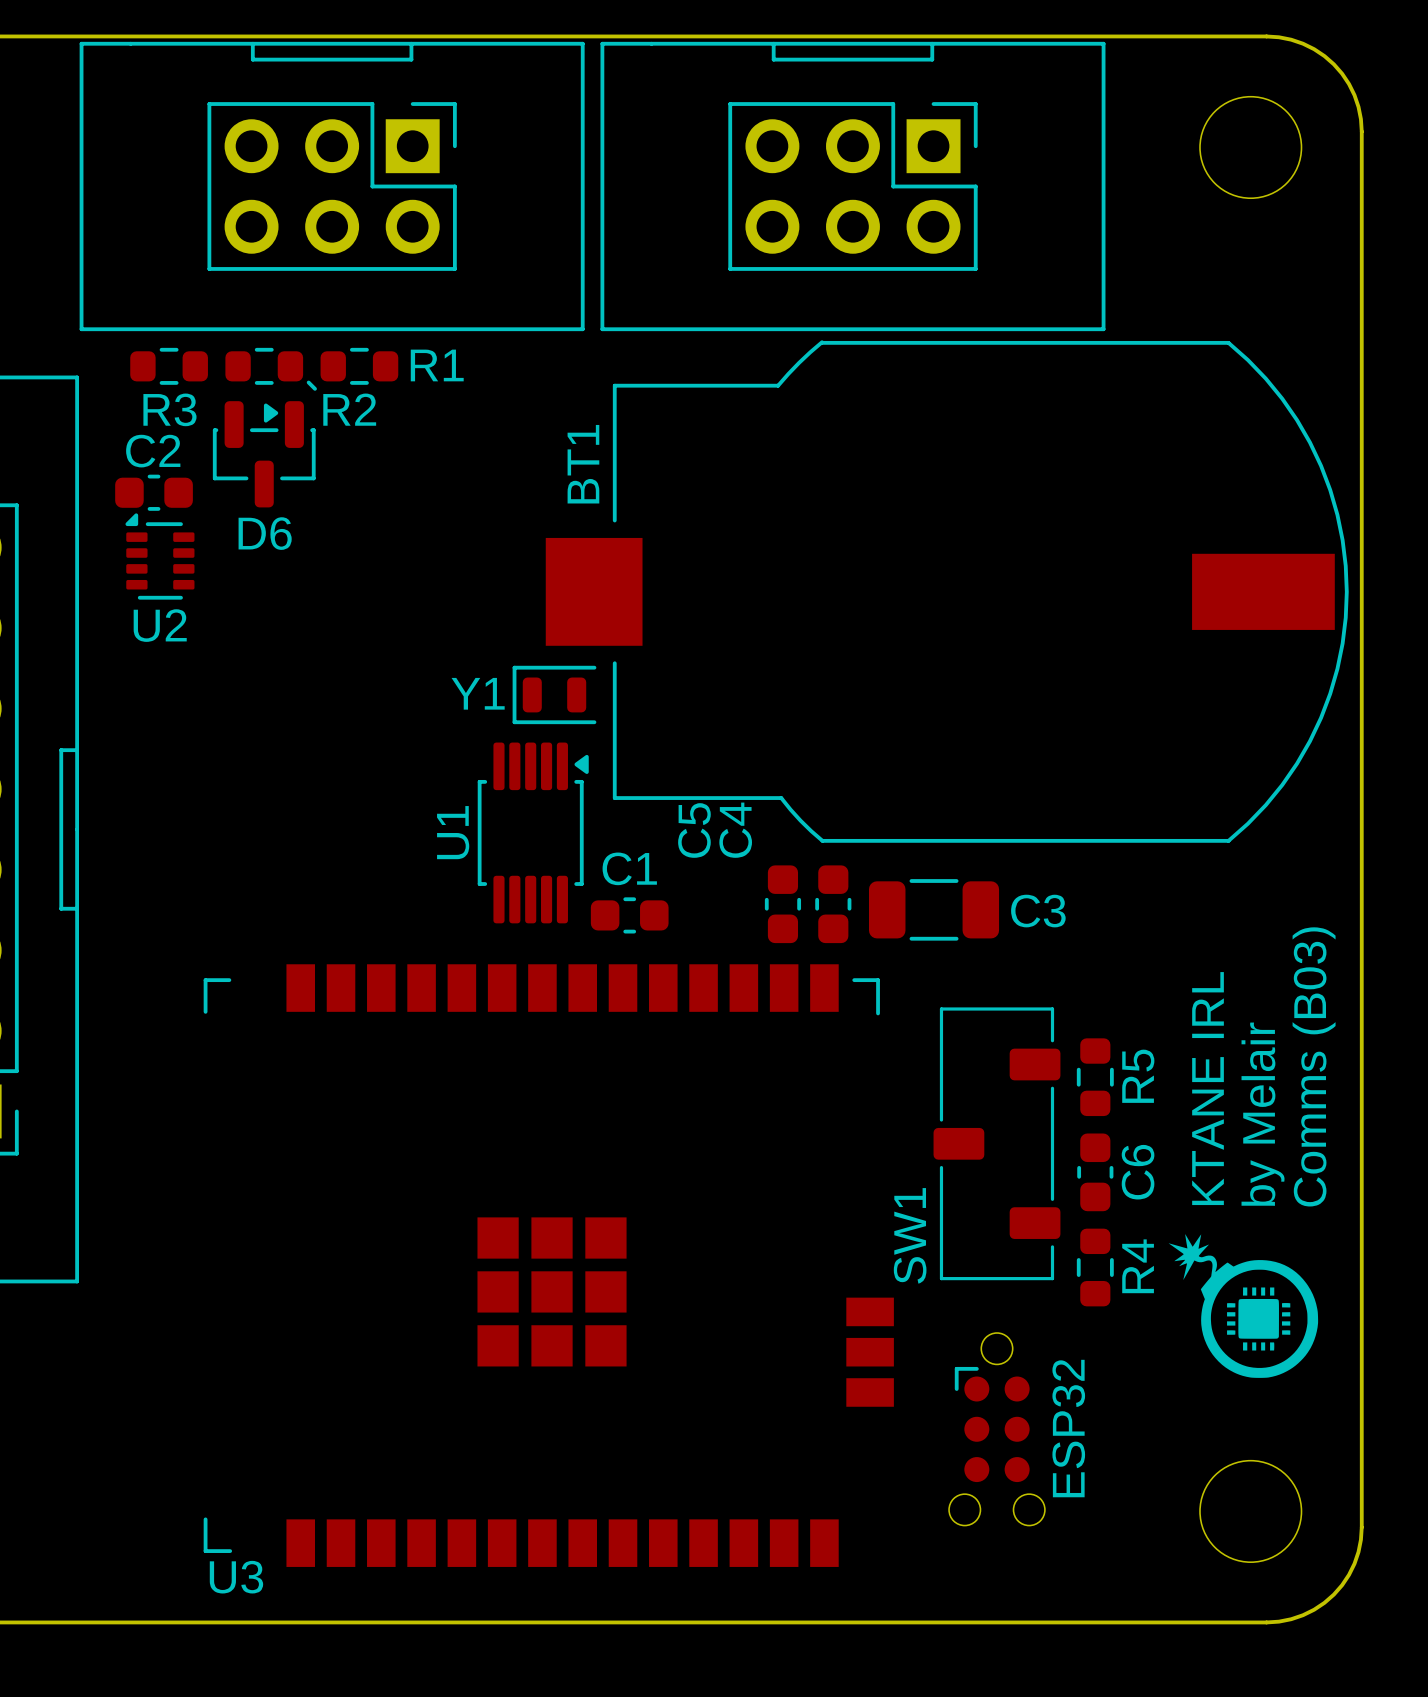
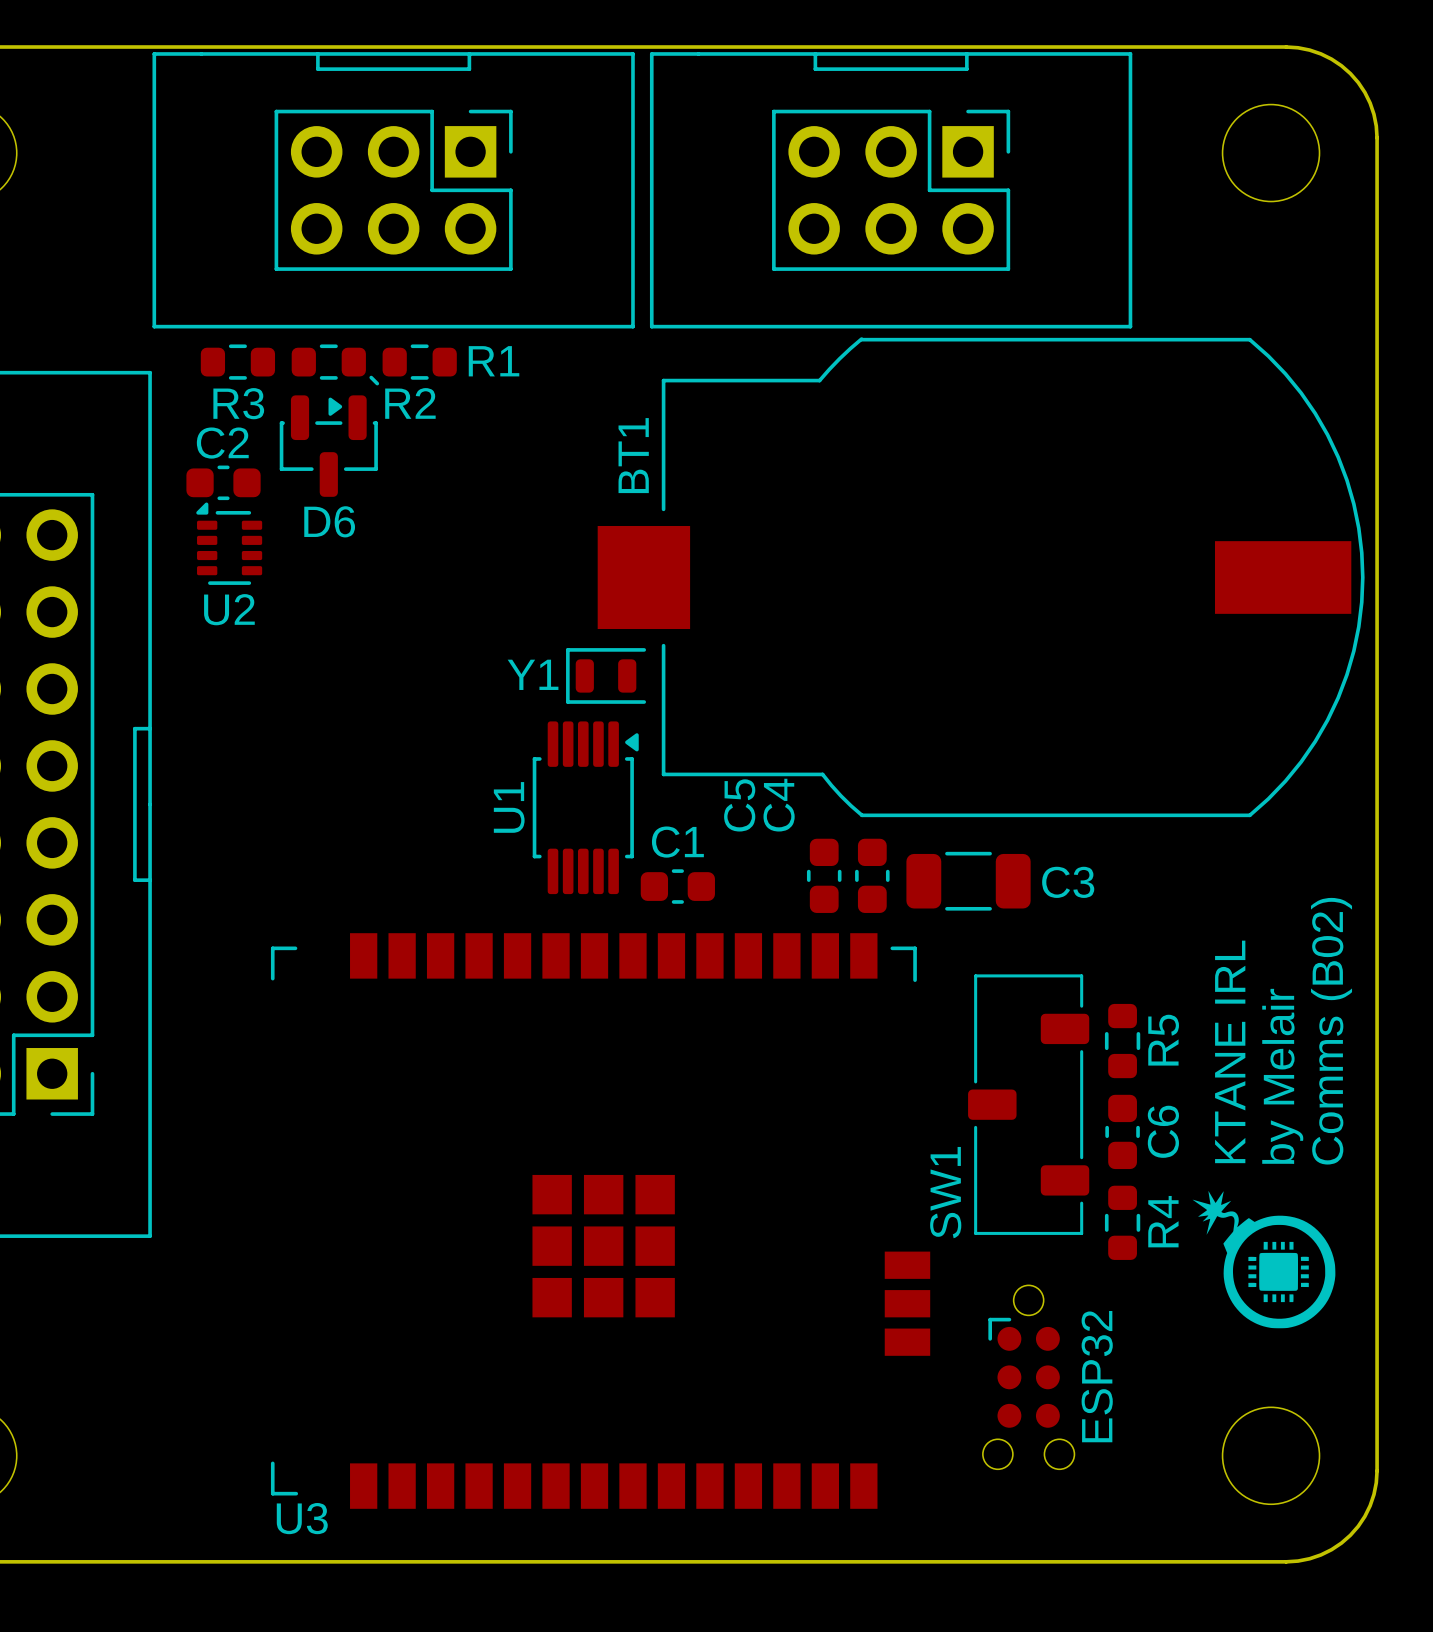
text: Comms (B03) (1314, 1066) -> Comms (B02) (1331, 1031)

